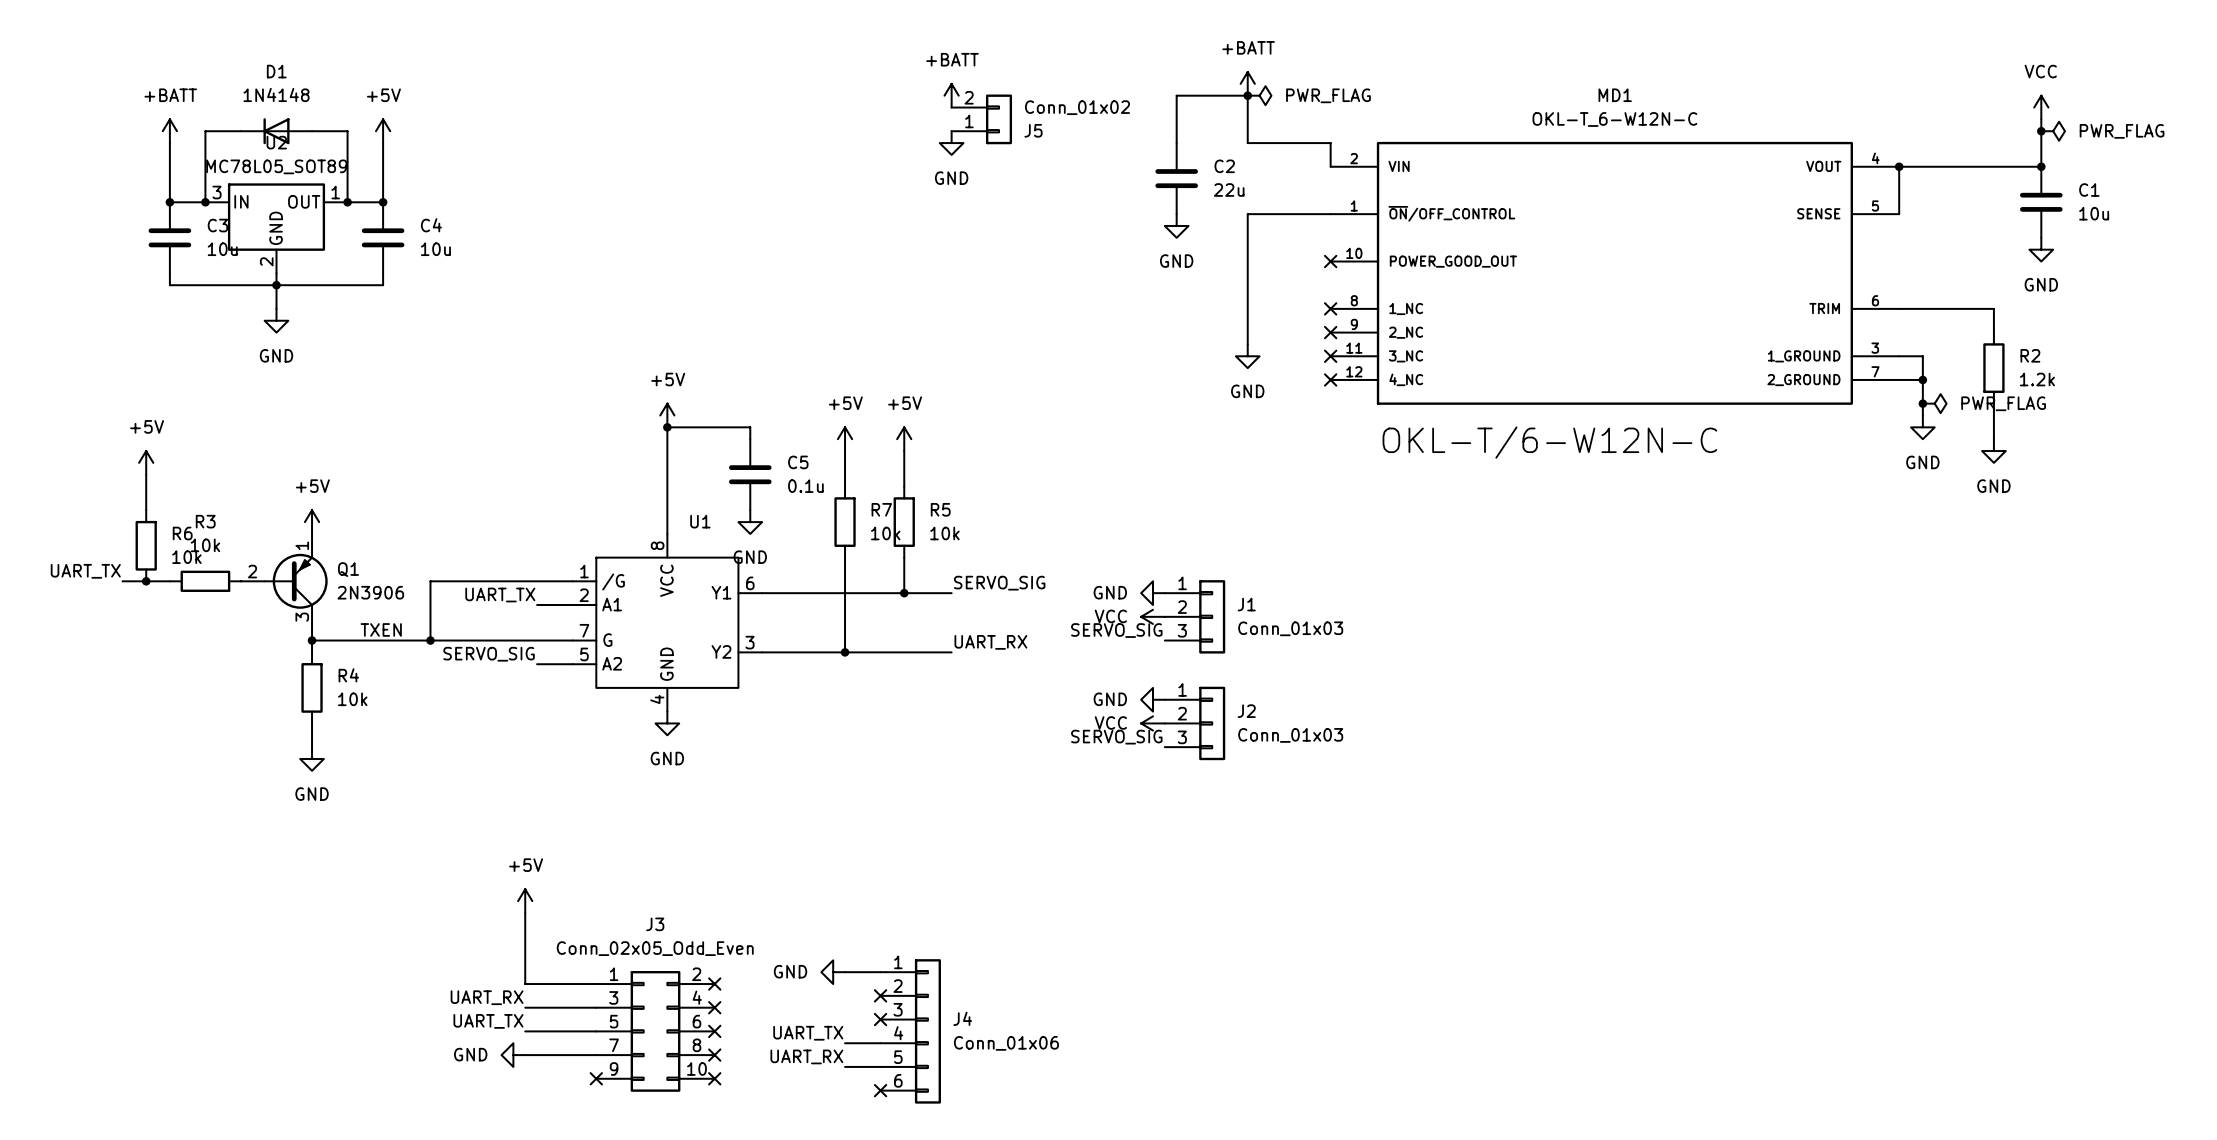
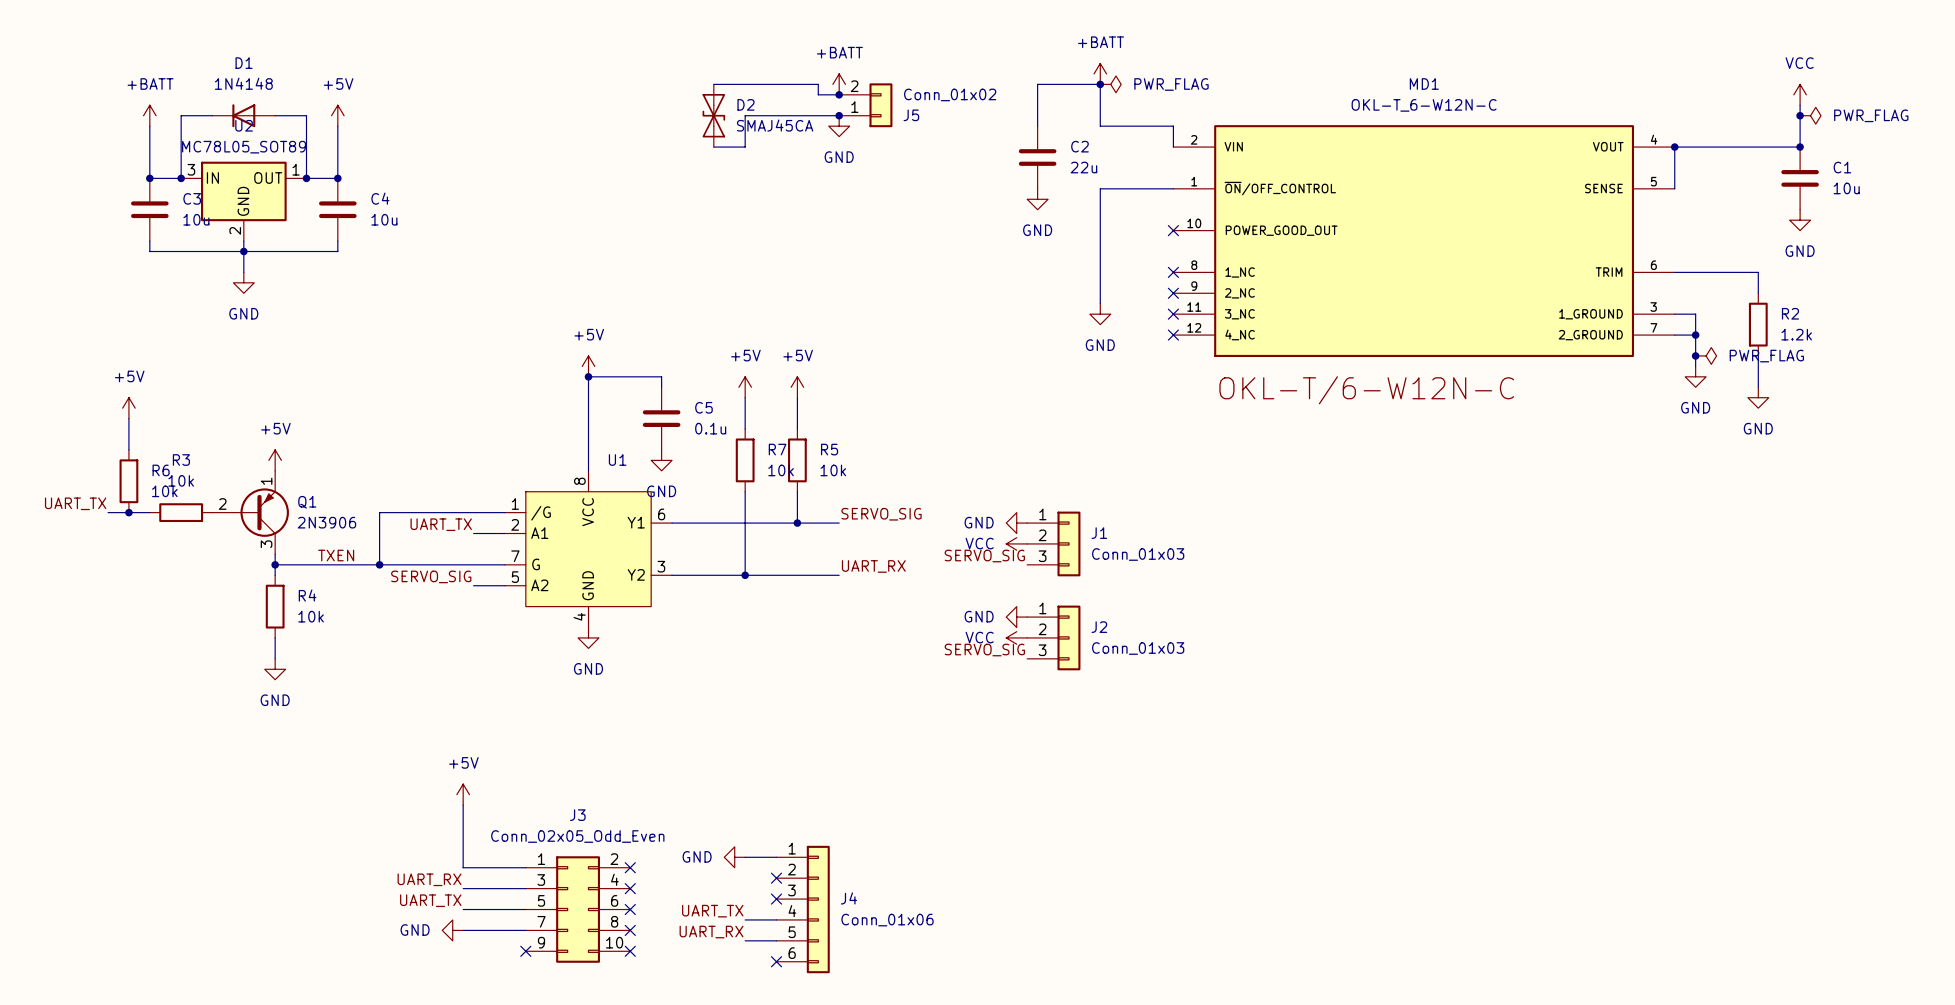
wire: none -> (713, 84) (818, 84) (818, 94) (839, 94)
junction: none -> (839, 94)
D2: none -> SMAJ45CA (713, 115)
wire: none -> (839, 115) (745, 115) (745, 147) (713, 147)
junction: none -> (839, 115)

